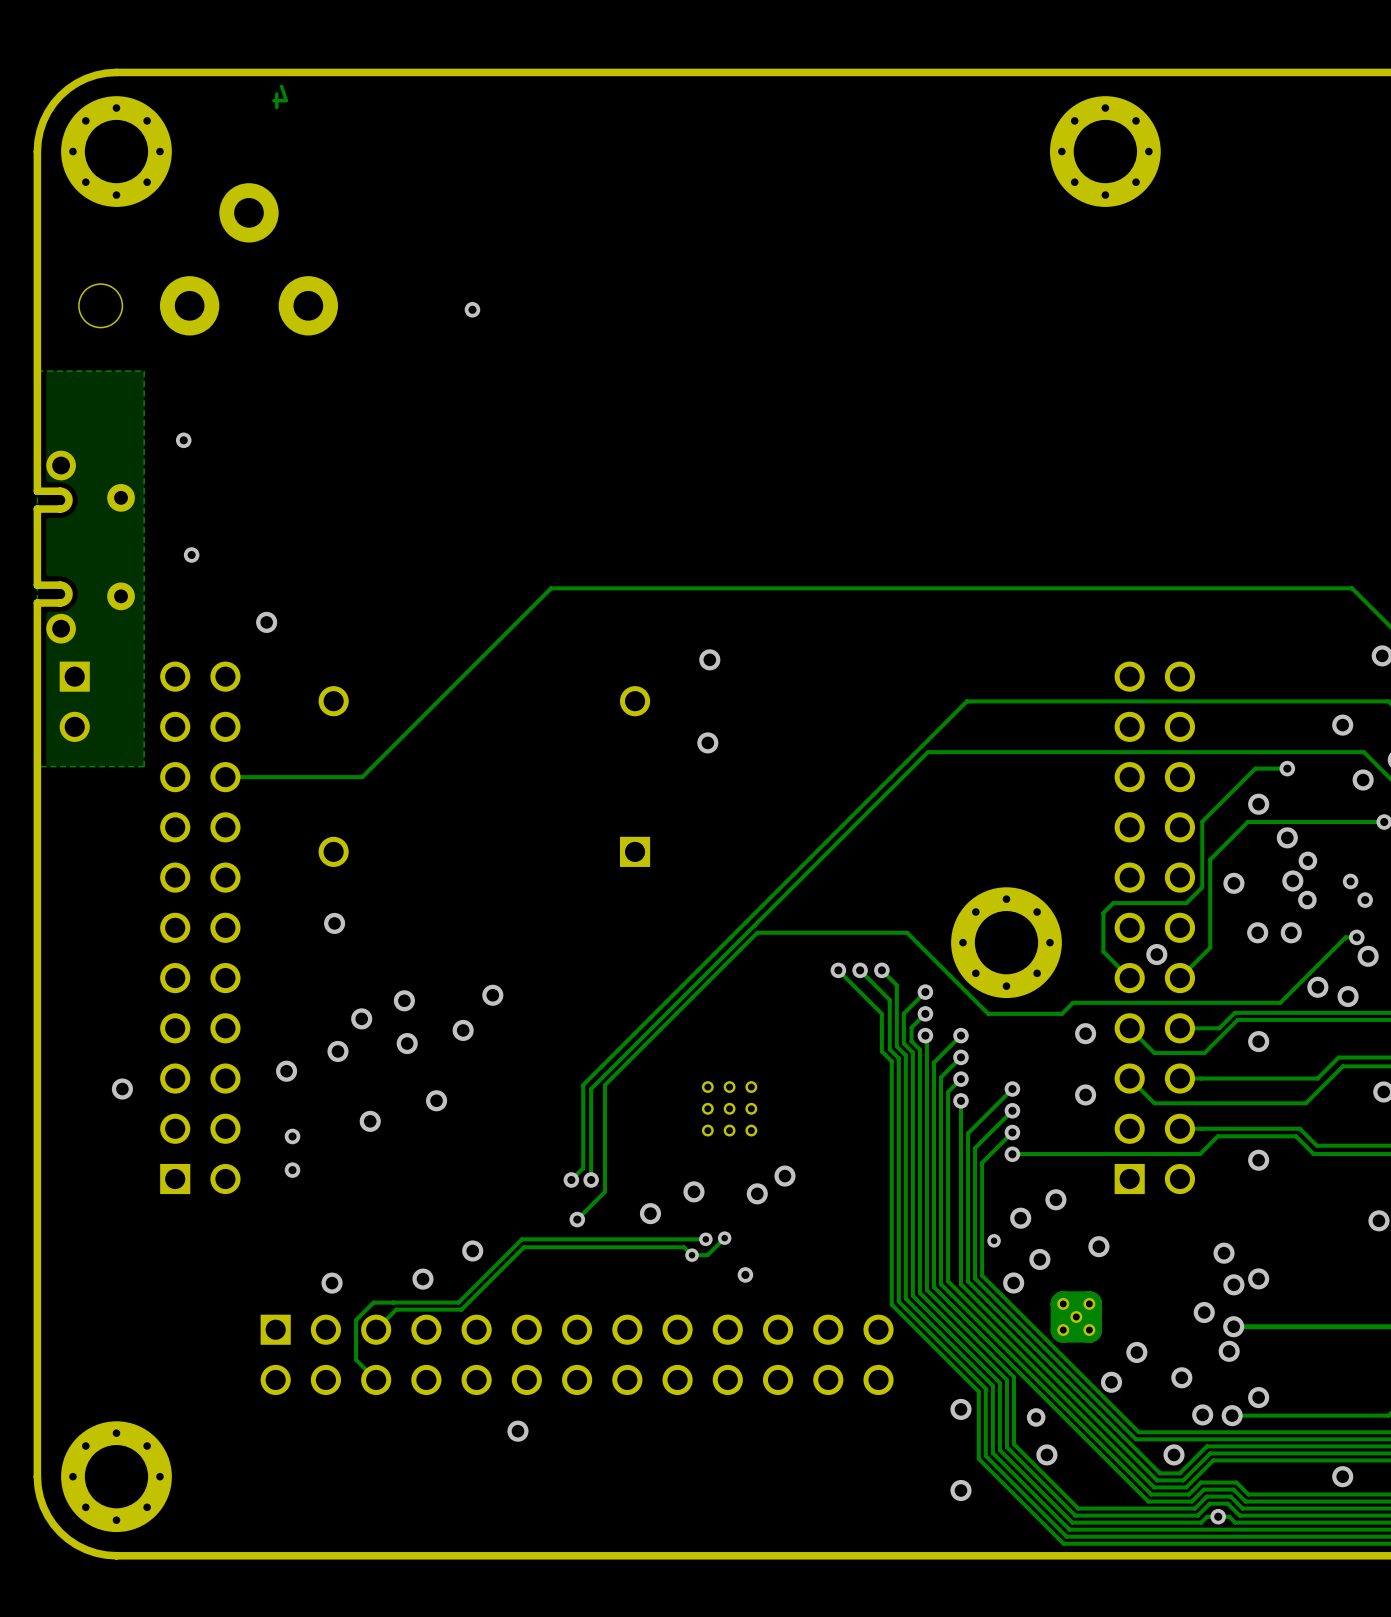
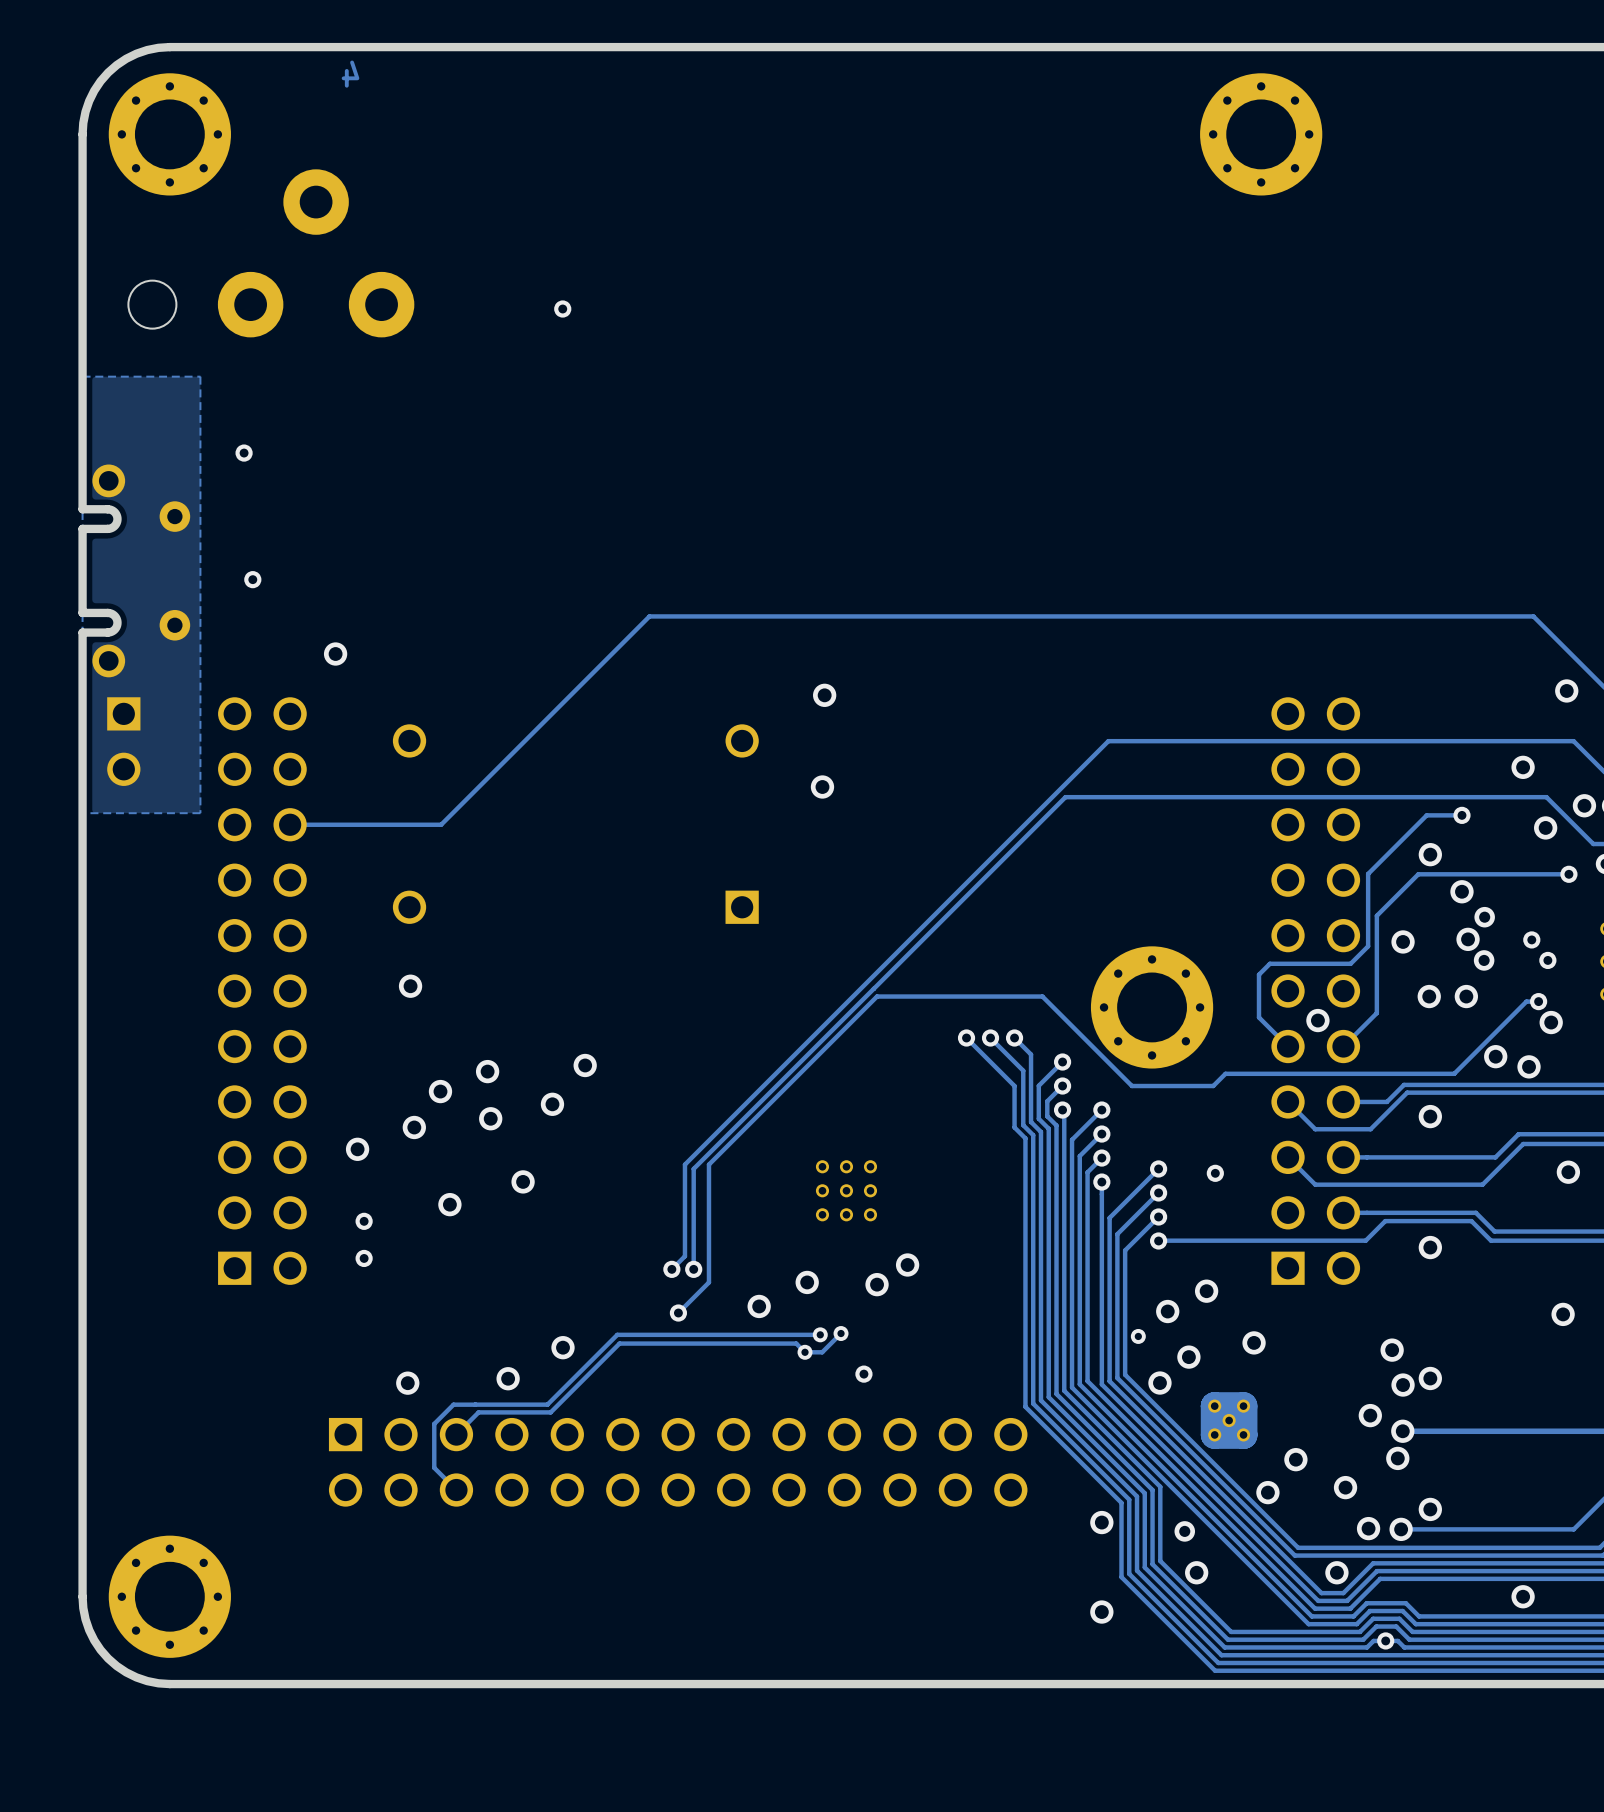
via: (1085, 1033) -> none
via: (122, 1089) -> none
via: none -> (1215, 1173)
via: (1085, 1094) -> none
via: (517, 1431) -> none

